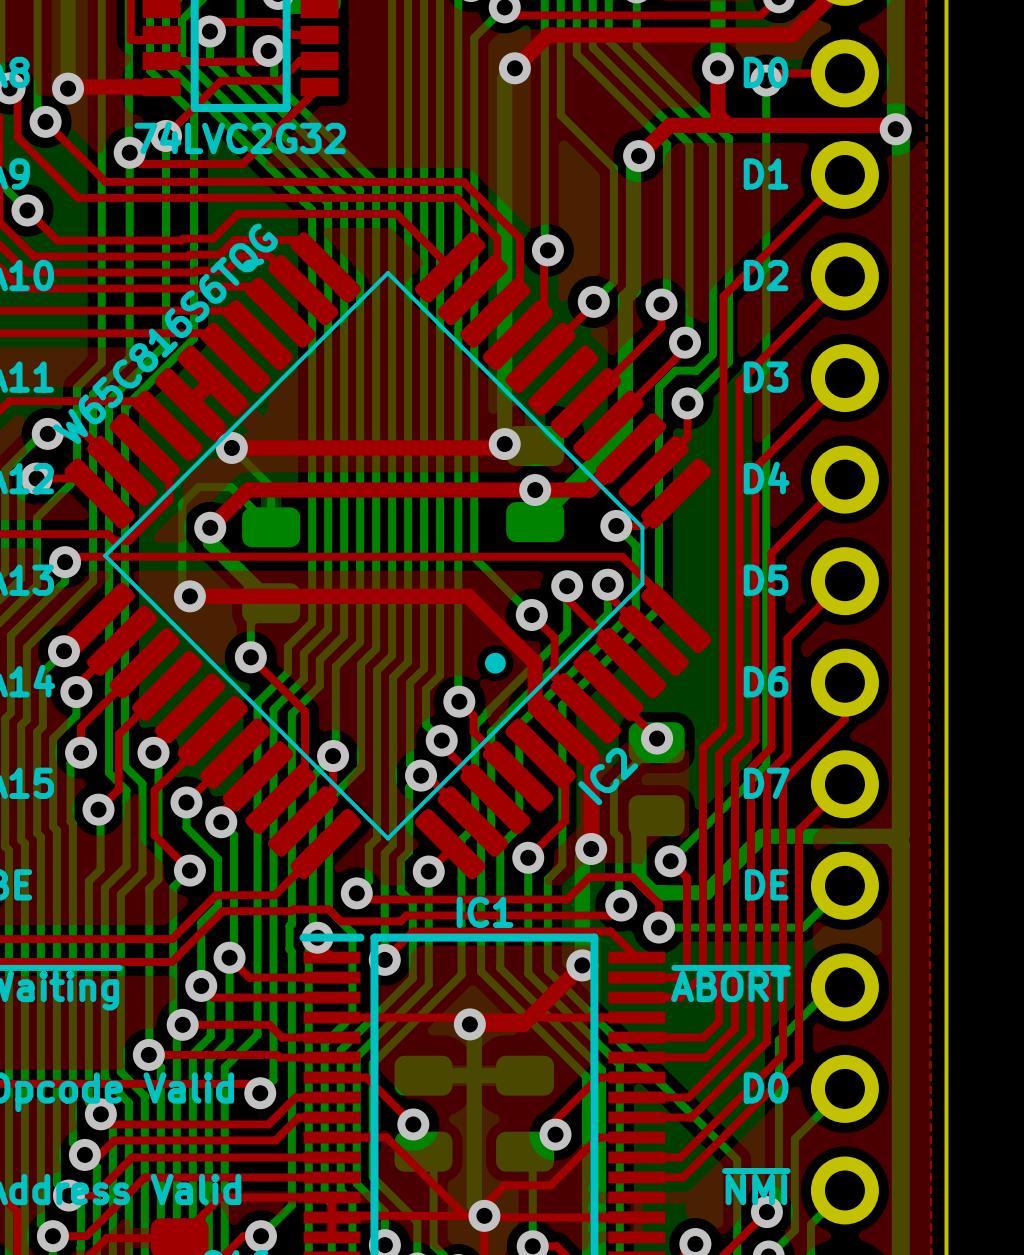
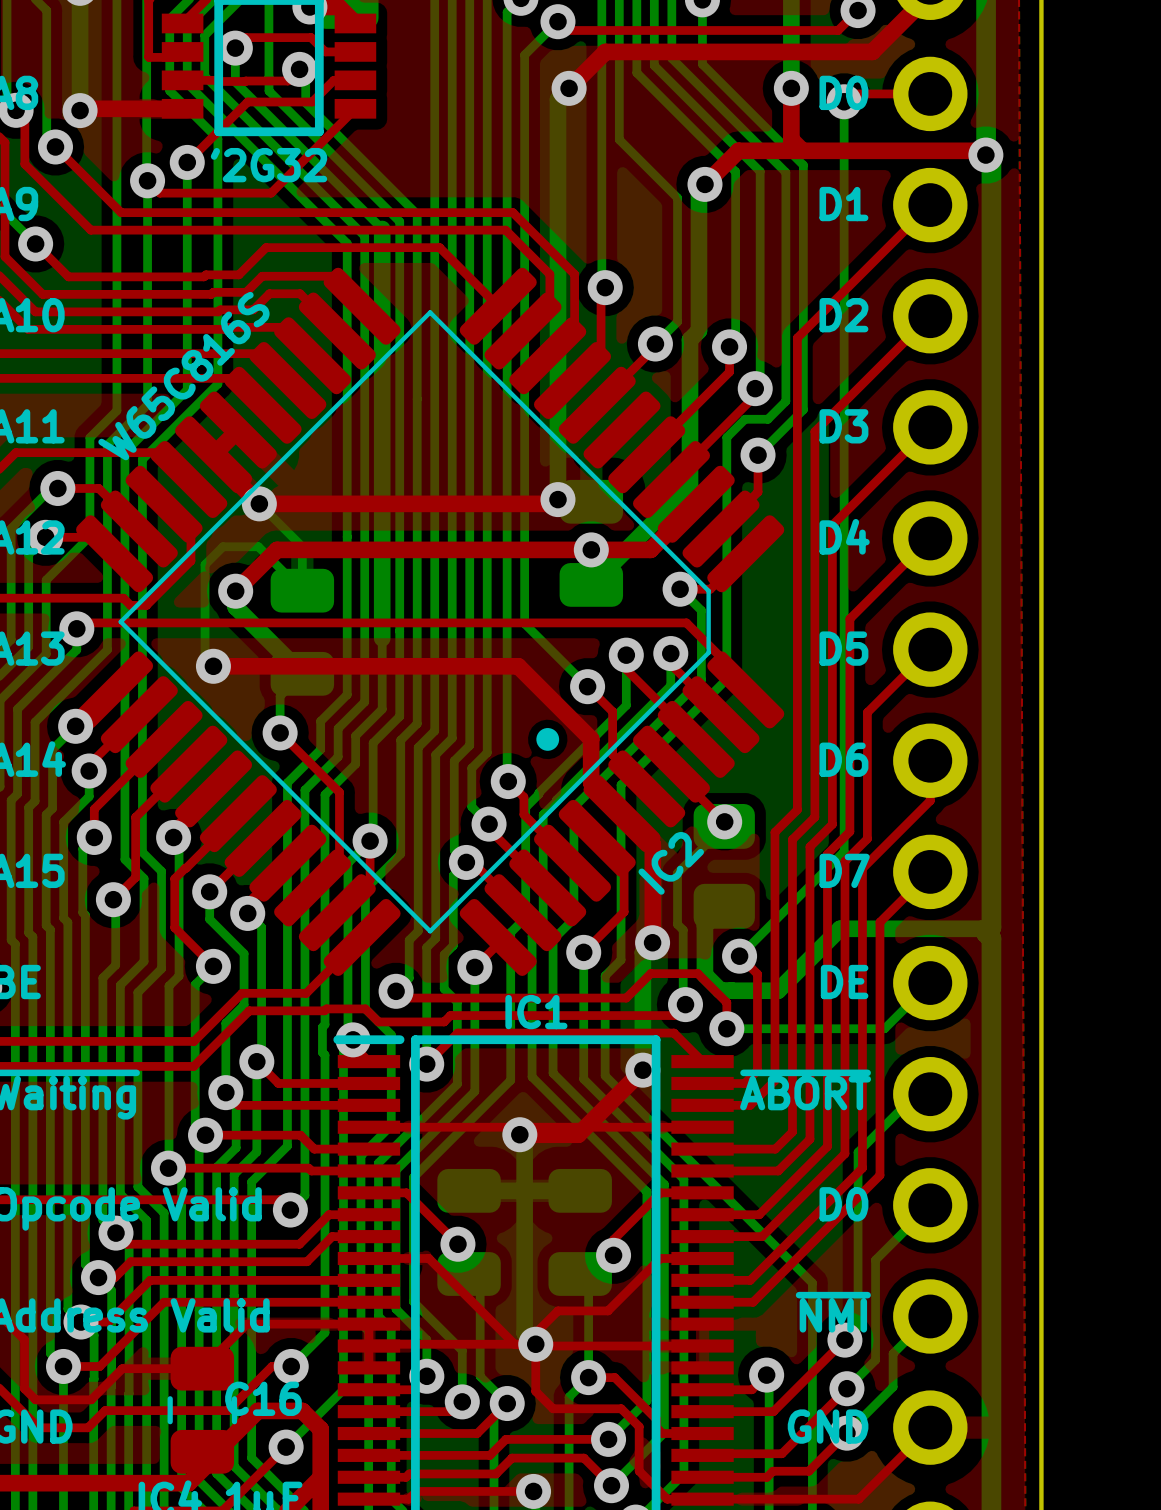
part text: 74LVC2G32 (240, 137) -> '2G32 (269, 165)
bottom track width: thin (344, 196) (344, 570) -> thick (382, 228) (382, 638)
IC2 text: none -> W65C816S (183, 376)
IC2 value: W65C816S6TQG (165, 333) -> none

